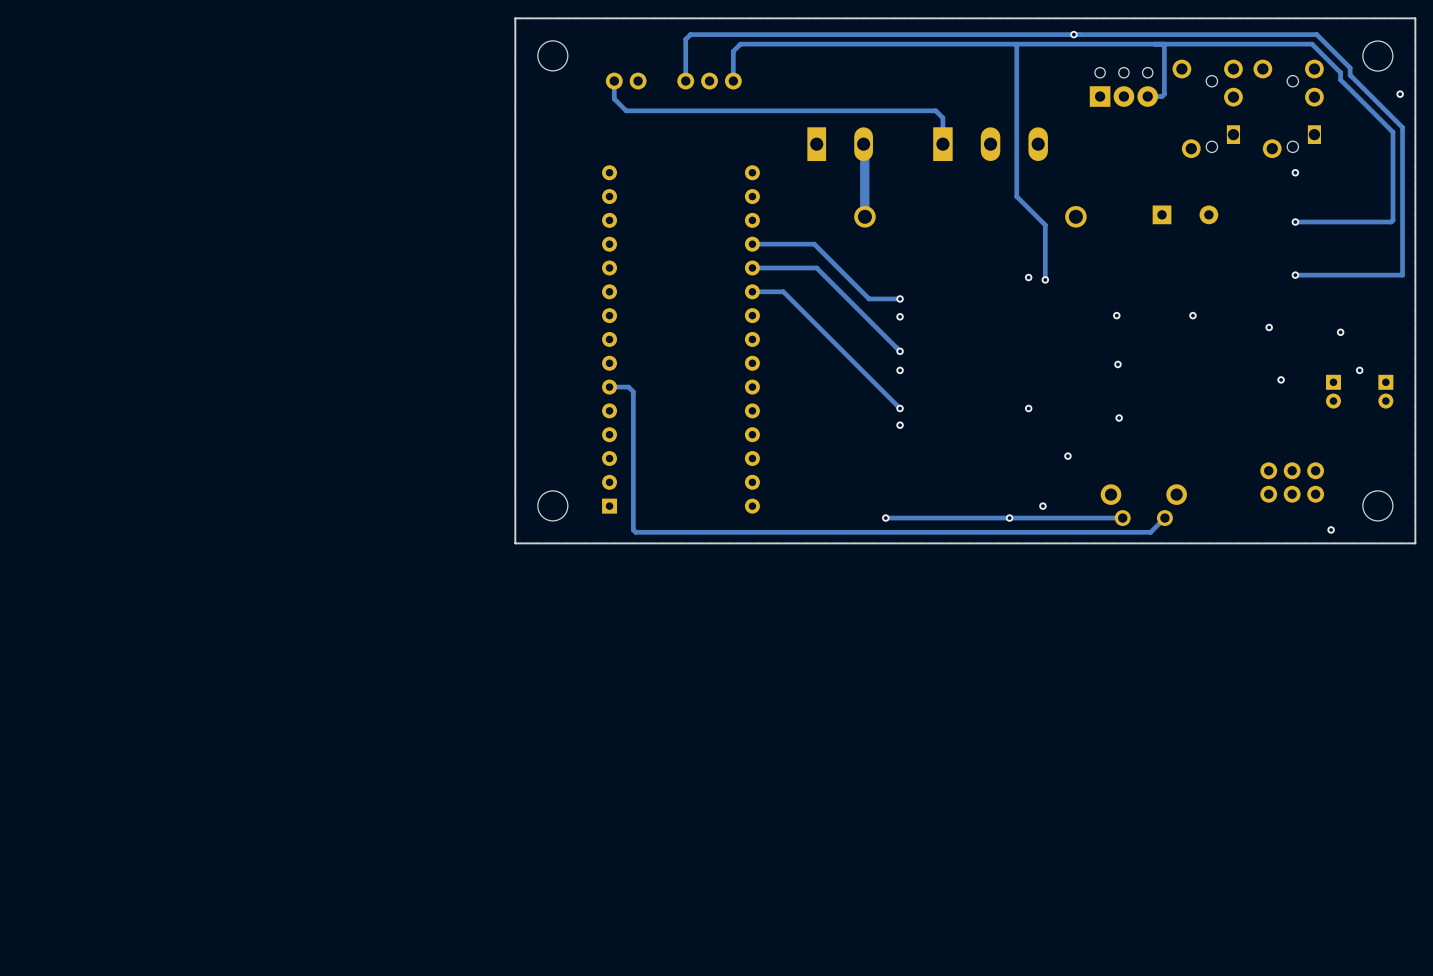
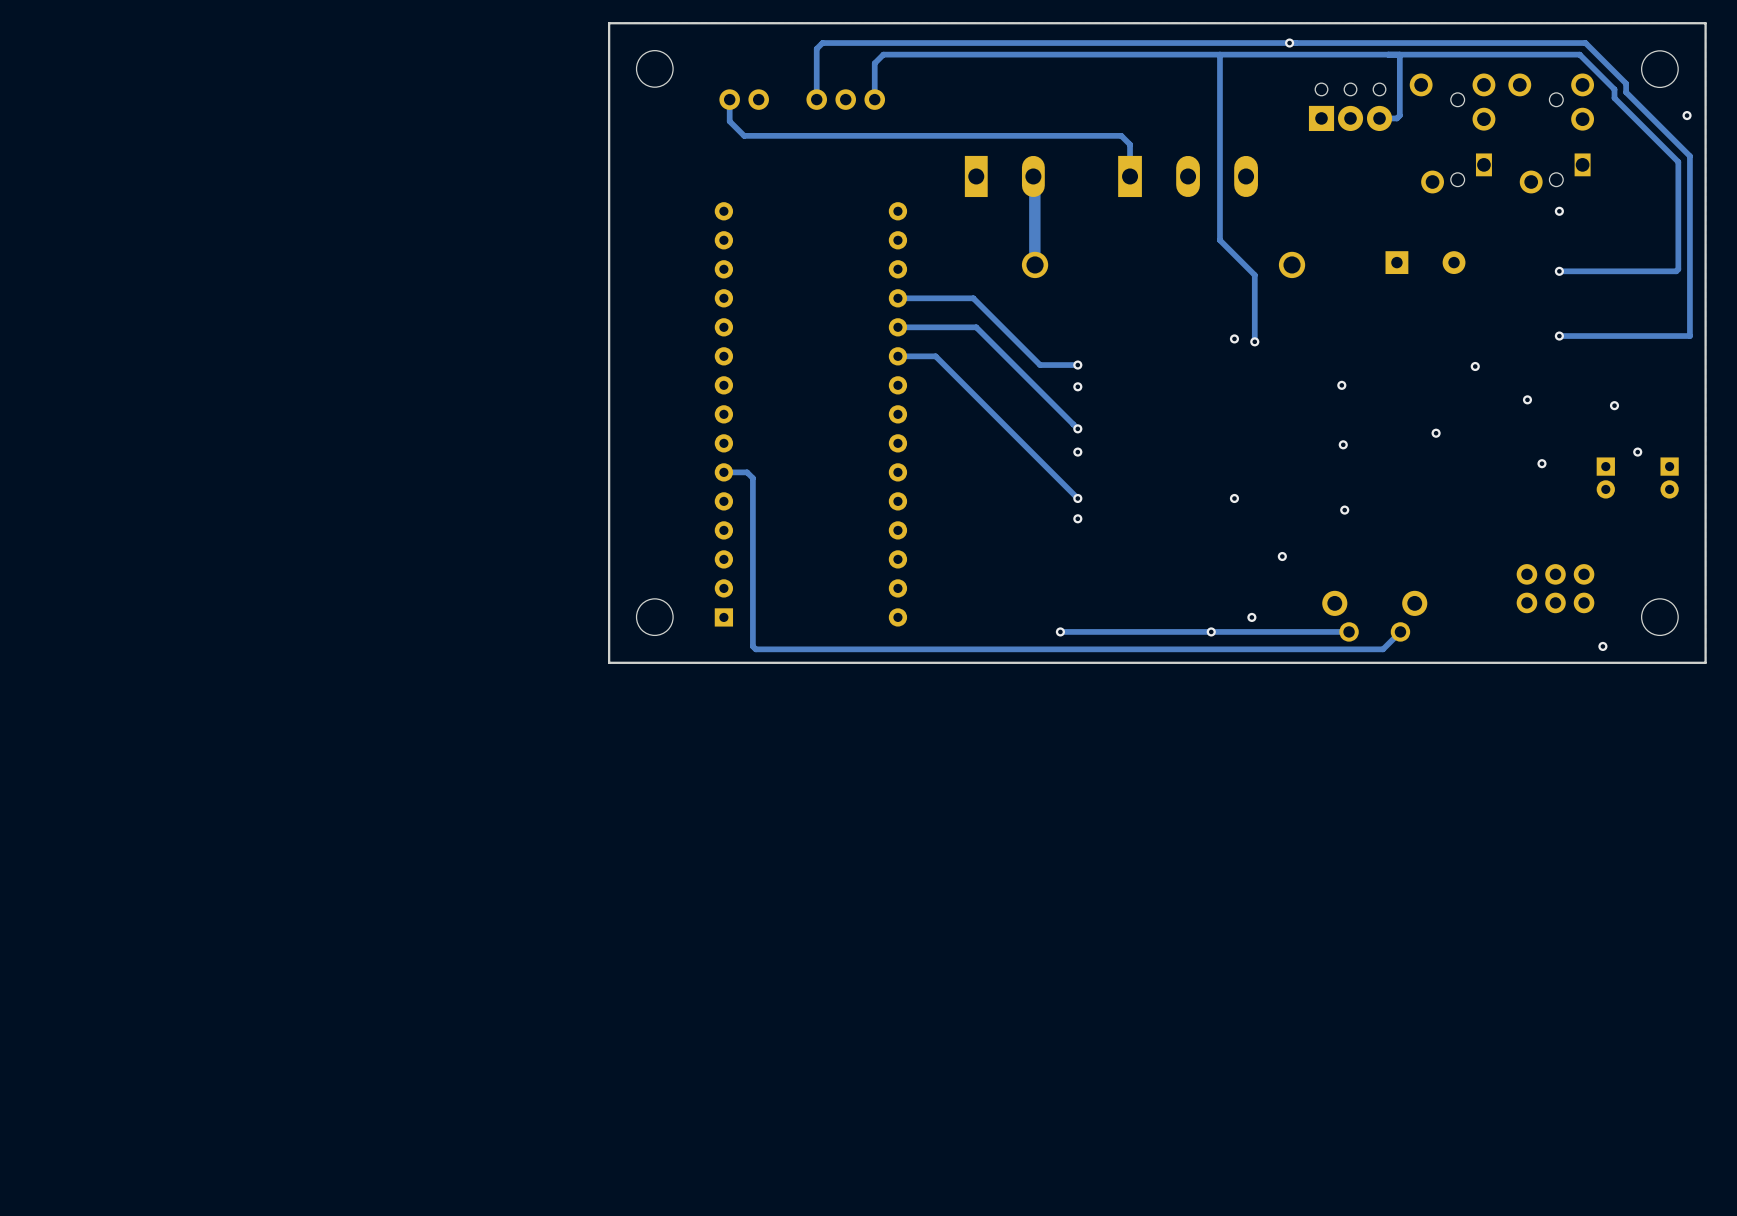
via: none -> (1475, 366)
via: (1192, 315) -> none
via: none -> (1436, 433)

